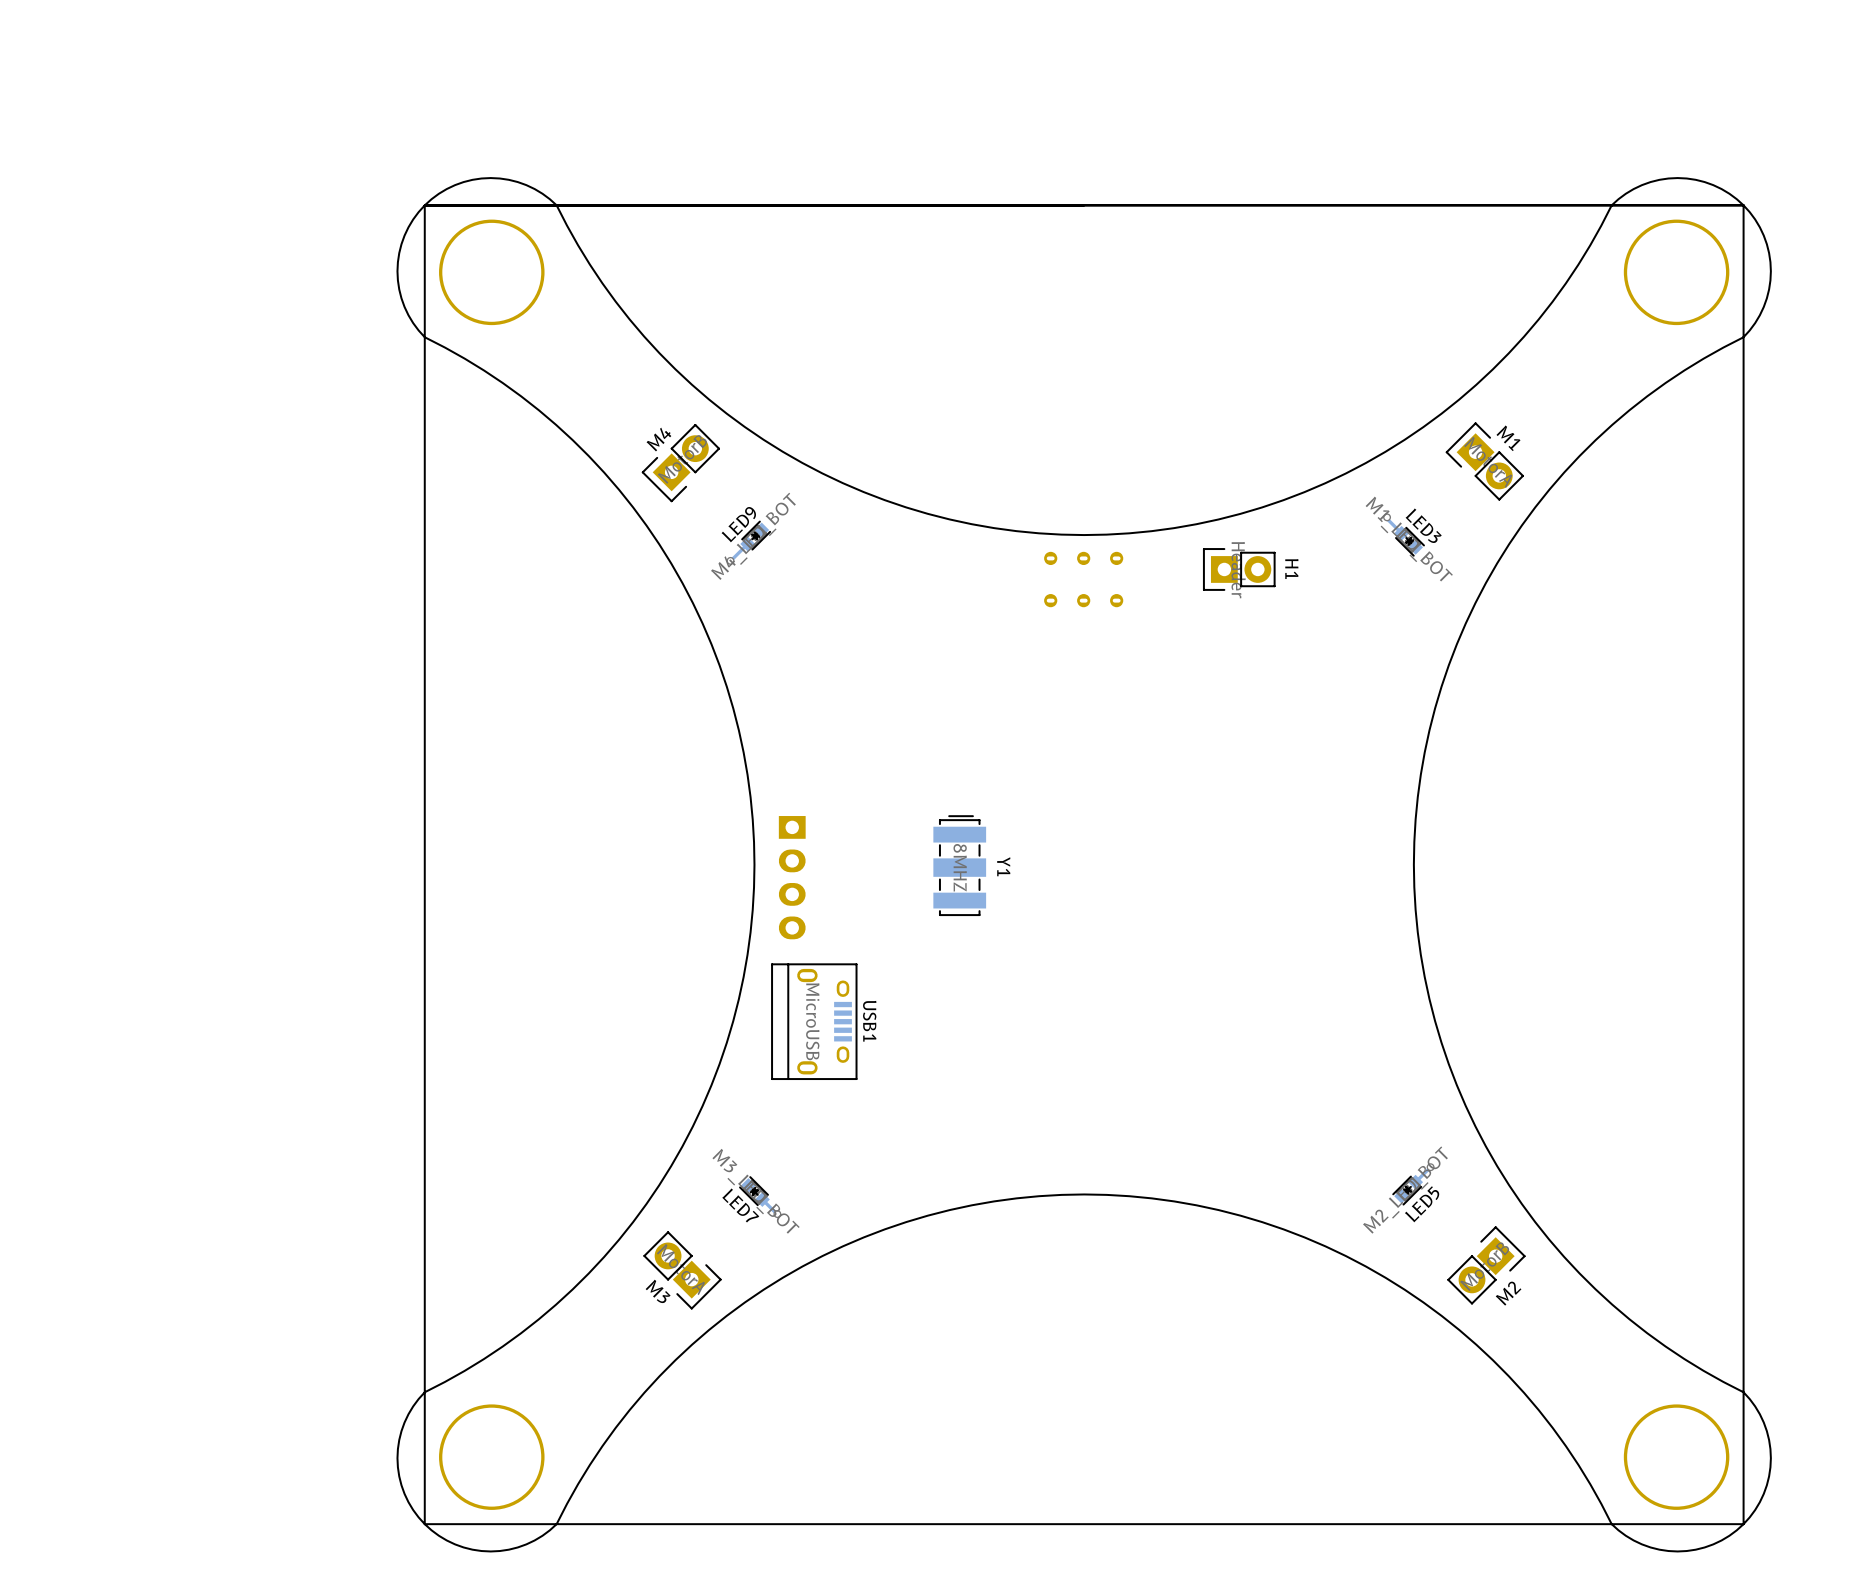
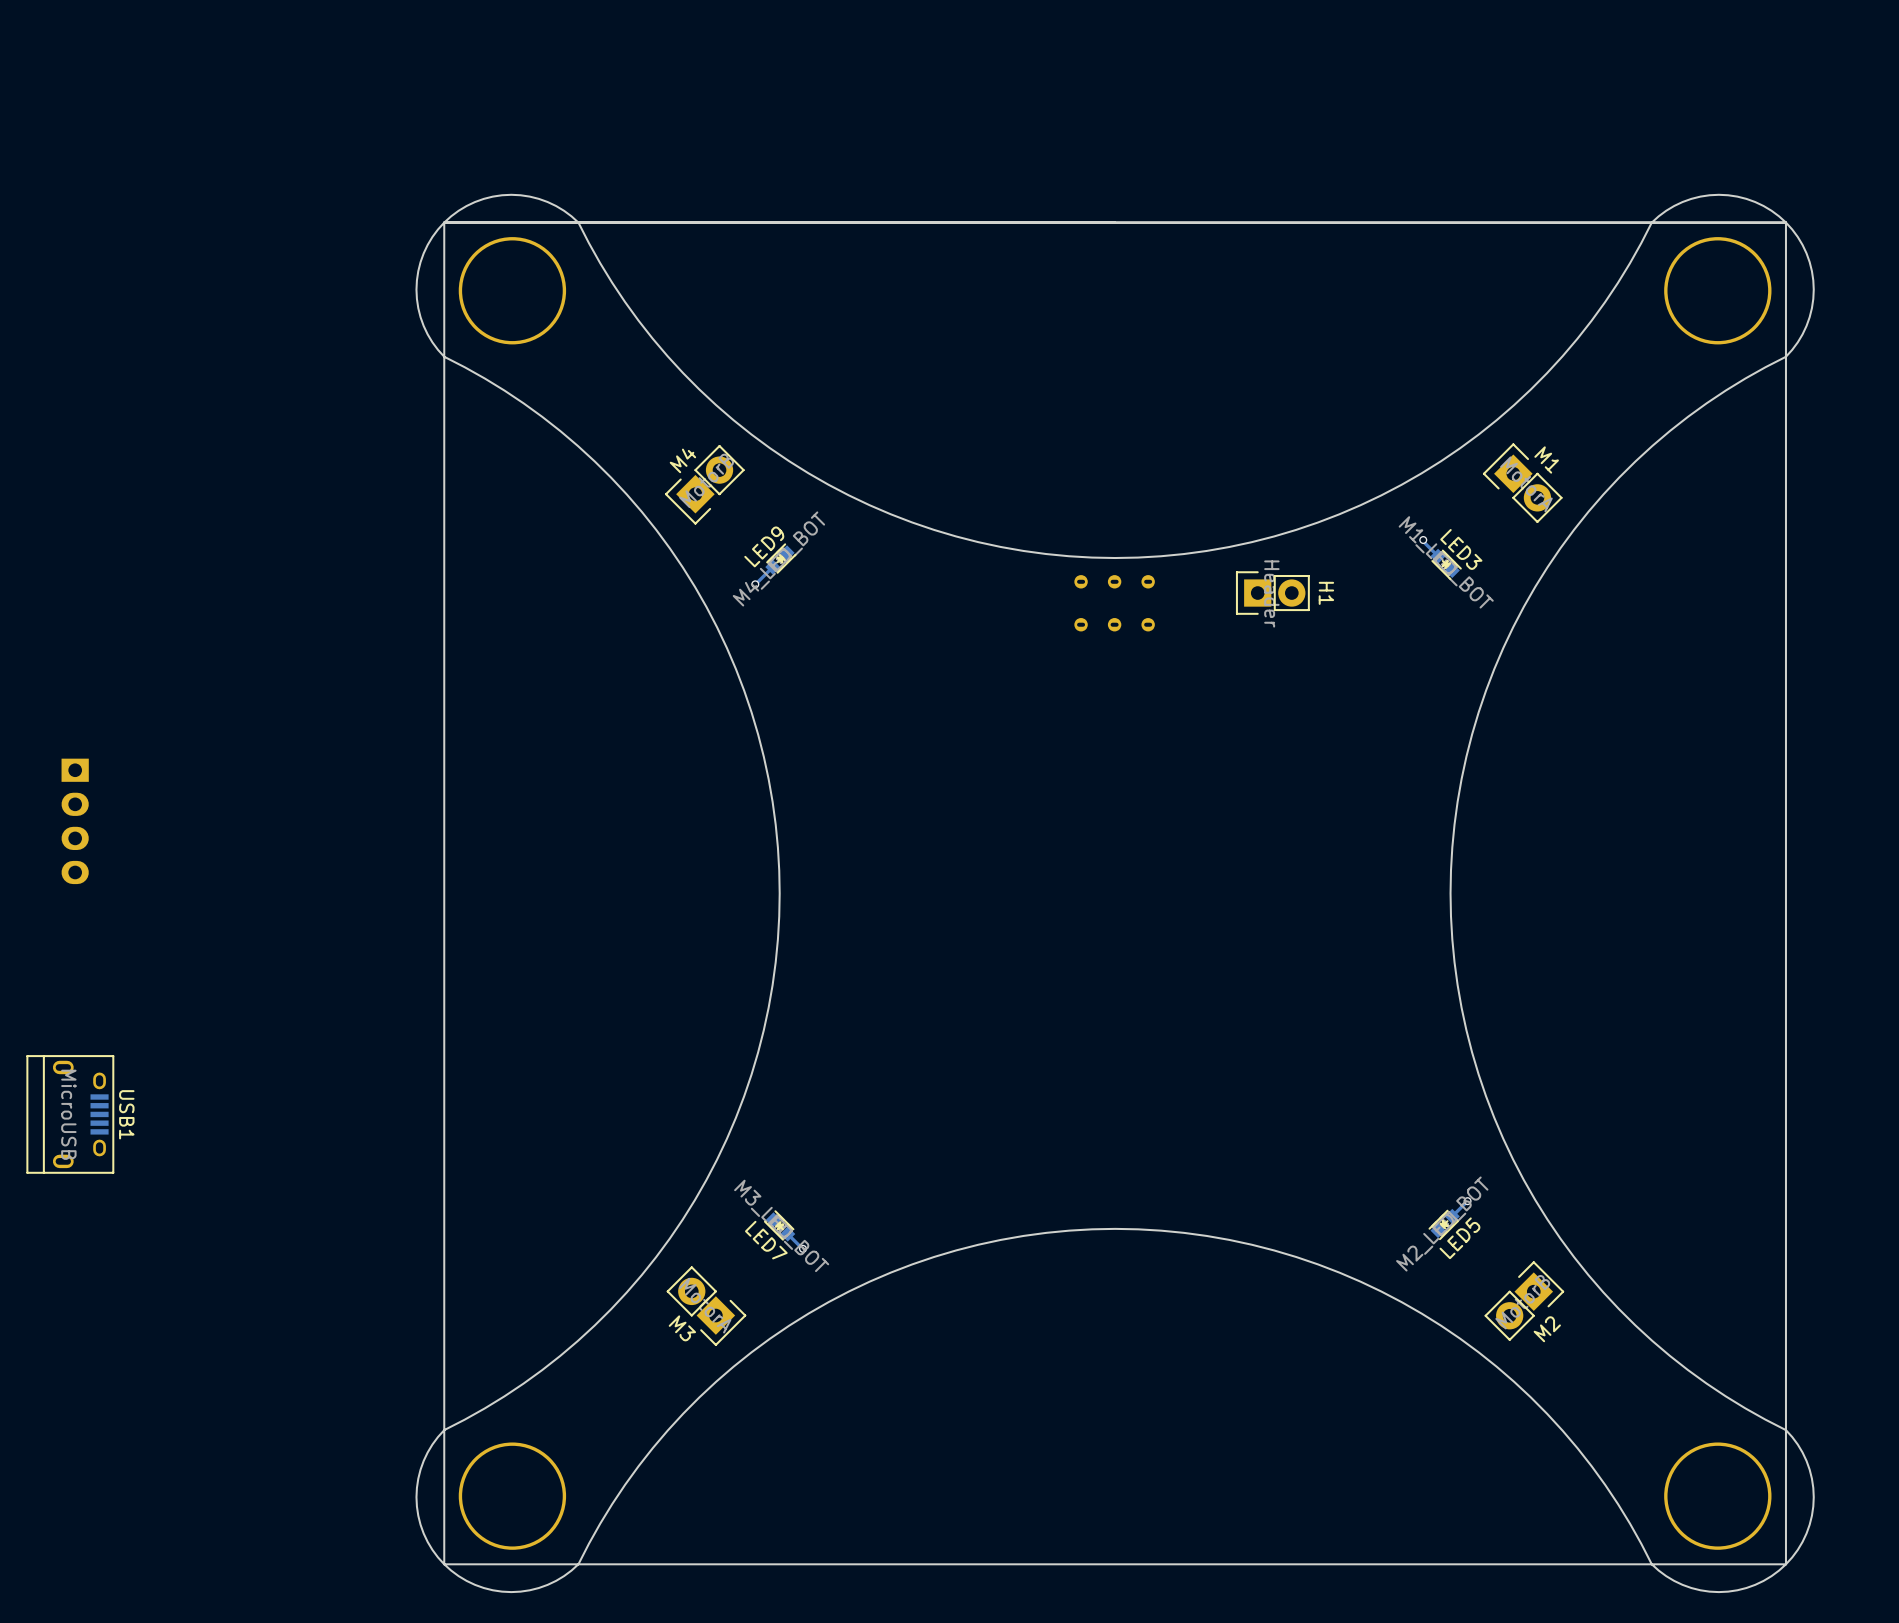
part: none -> (75, 821)
Y1: 8MHZ (959, 865) -> none
part: (792, 877) -> none
USB1 position: (814, 1021) -> (70, 1114)

